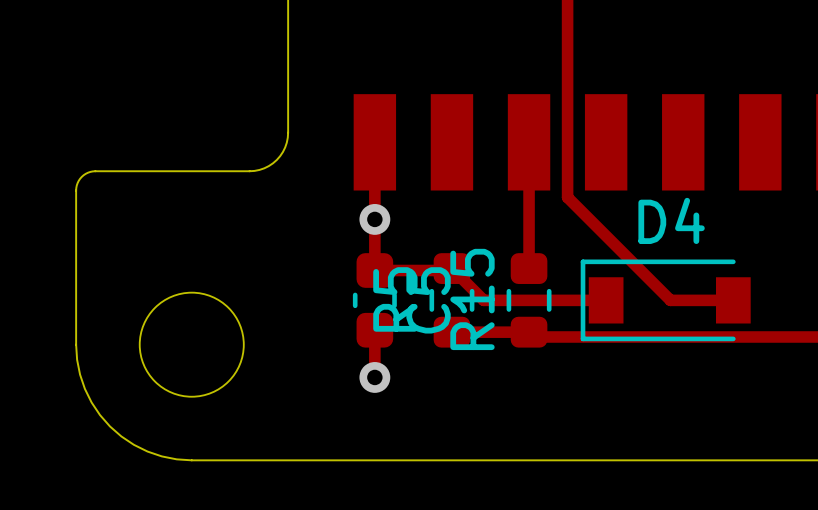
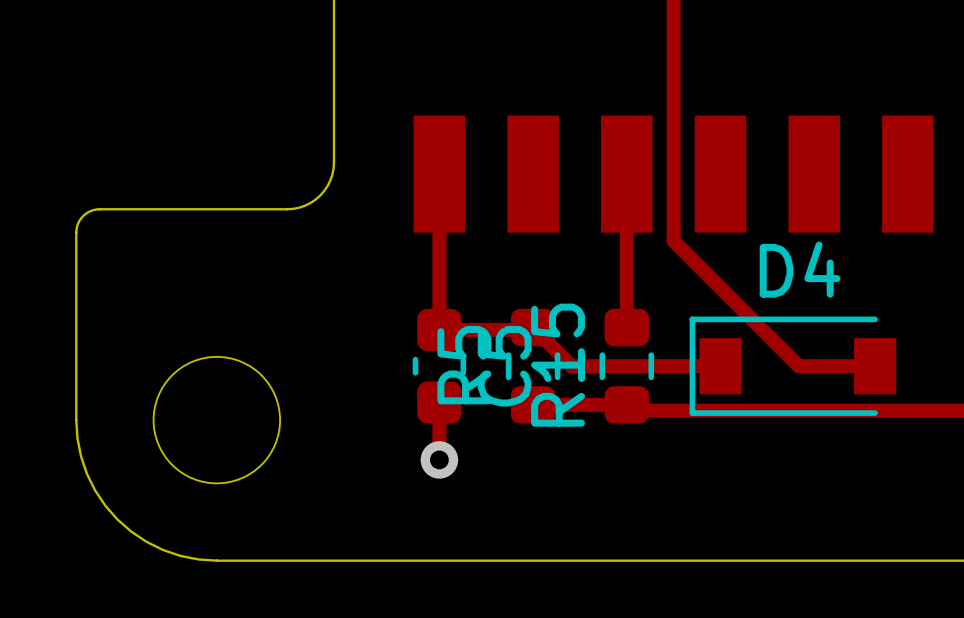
via: (374, 219) -> none

